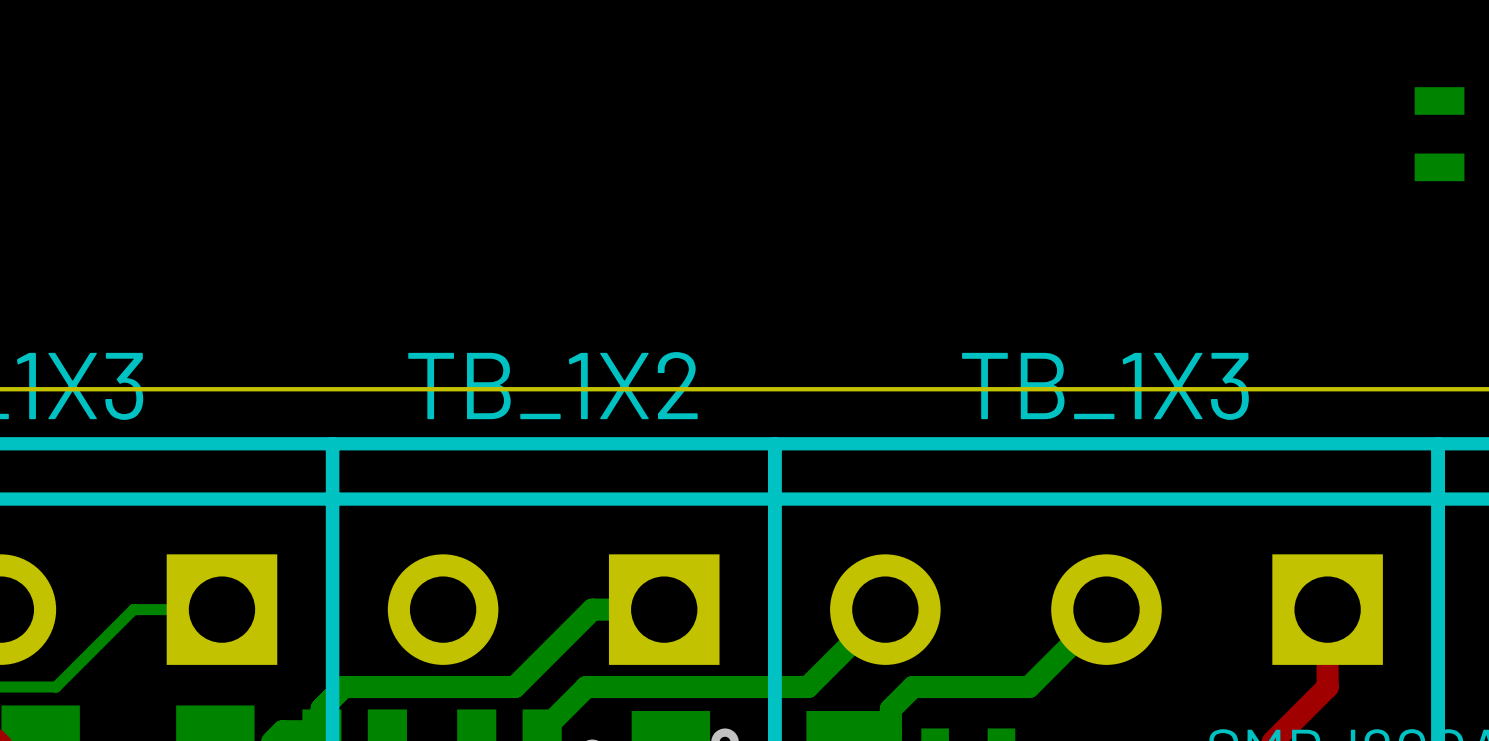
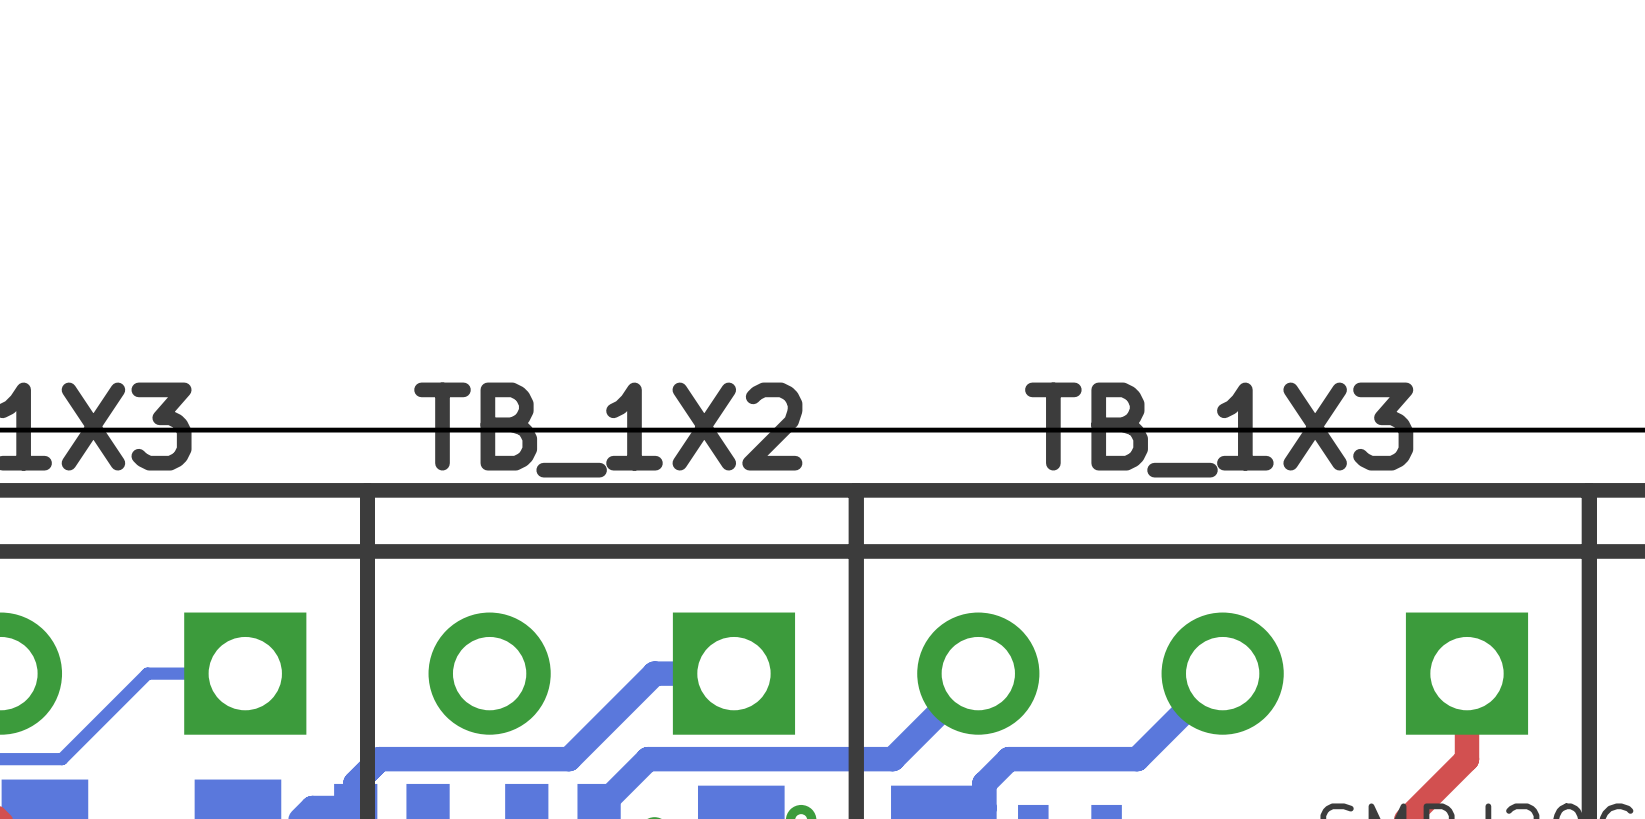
part: (1439, 134) -> none

